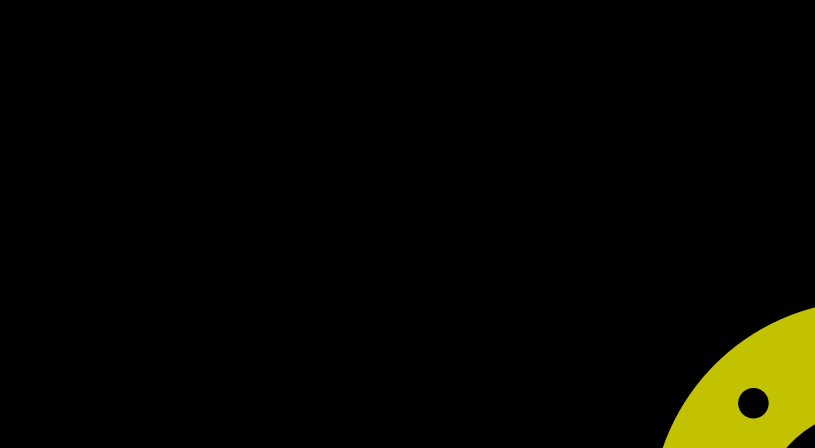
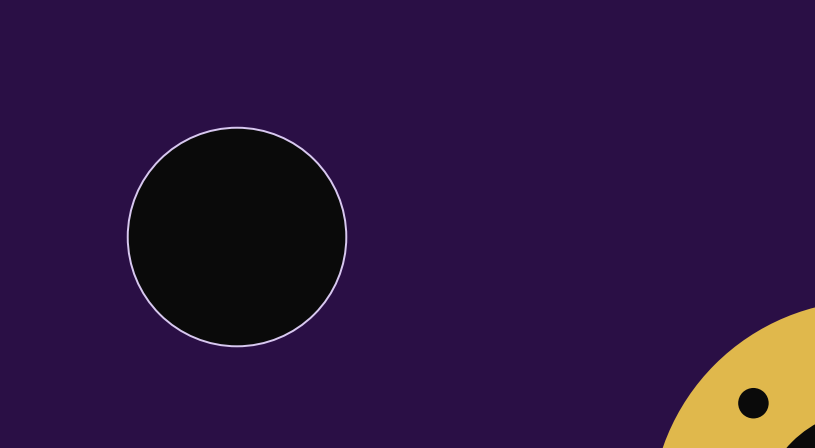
part: none -> (237, 237)

